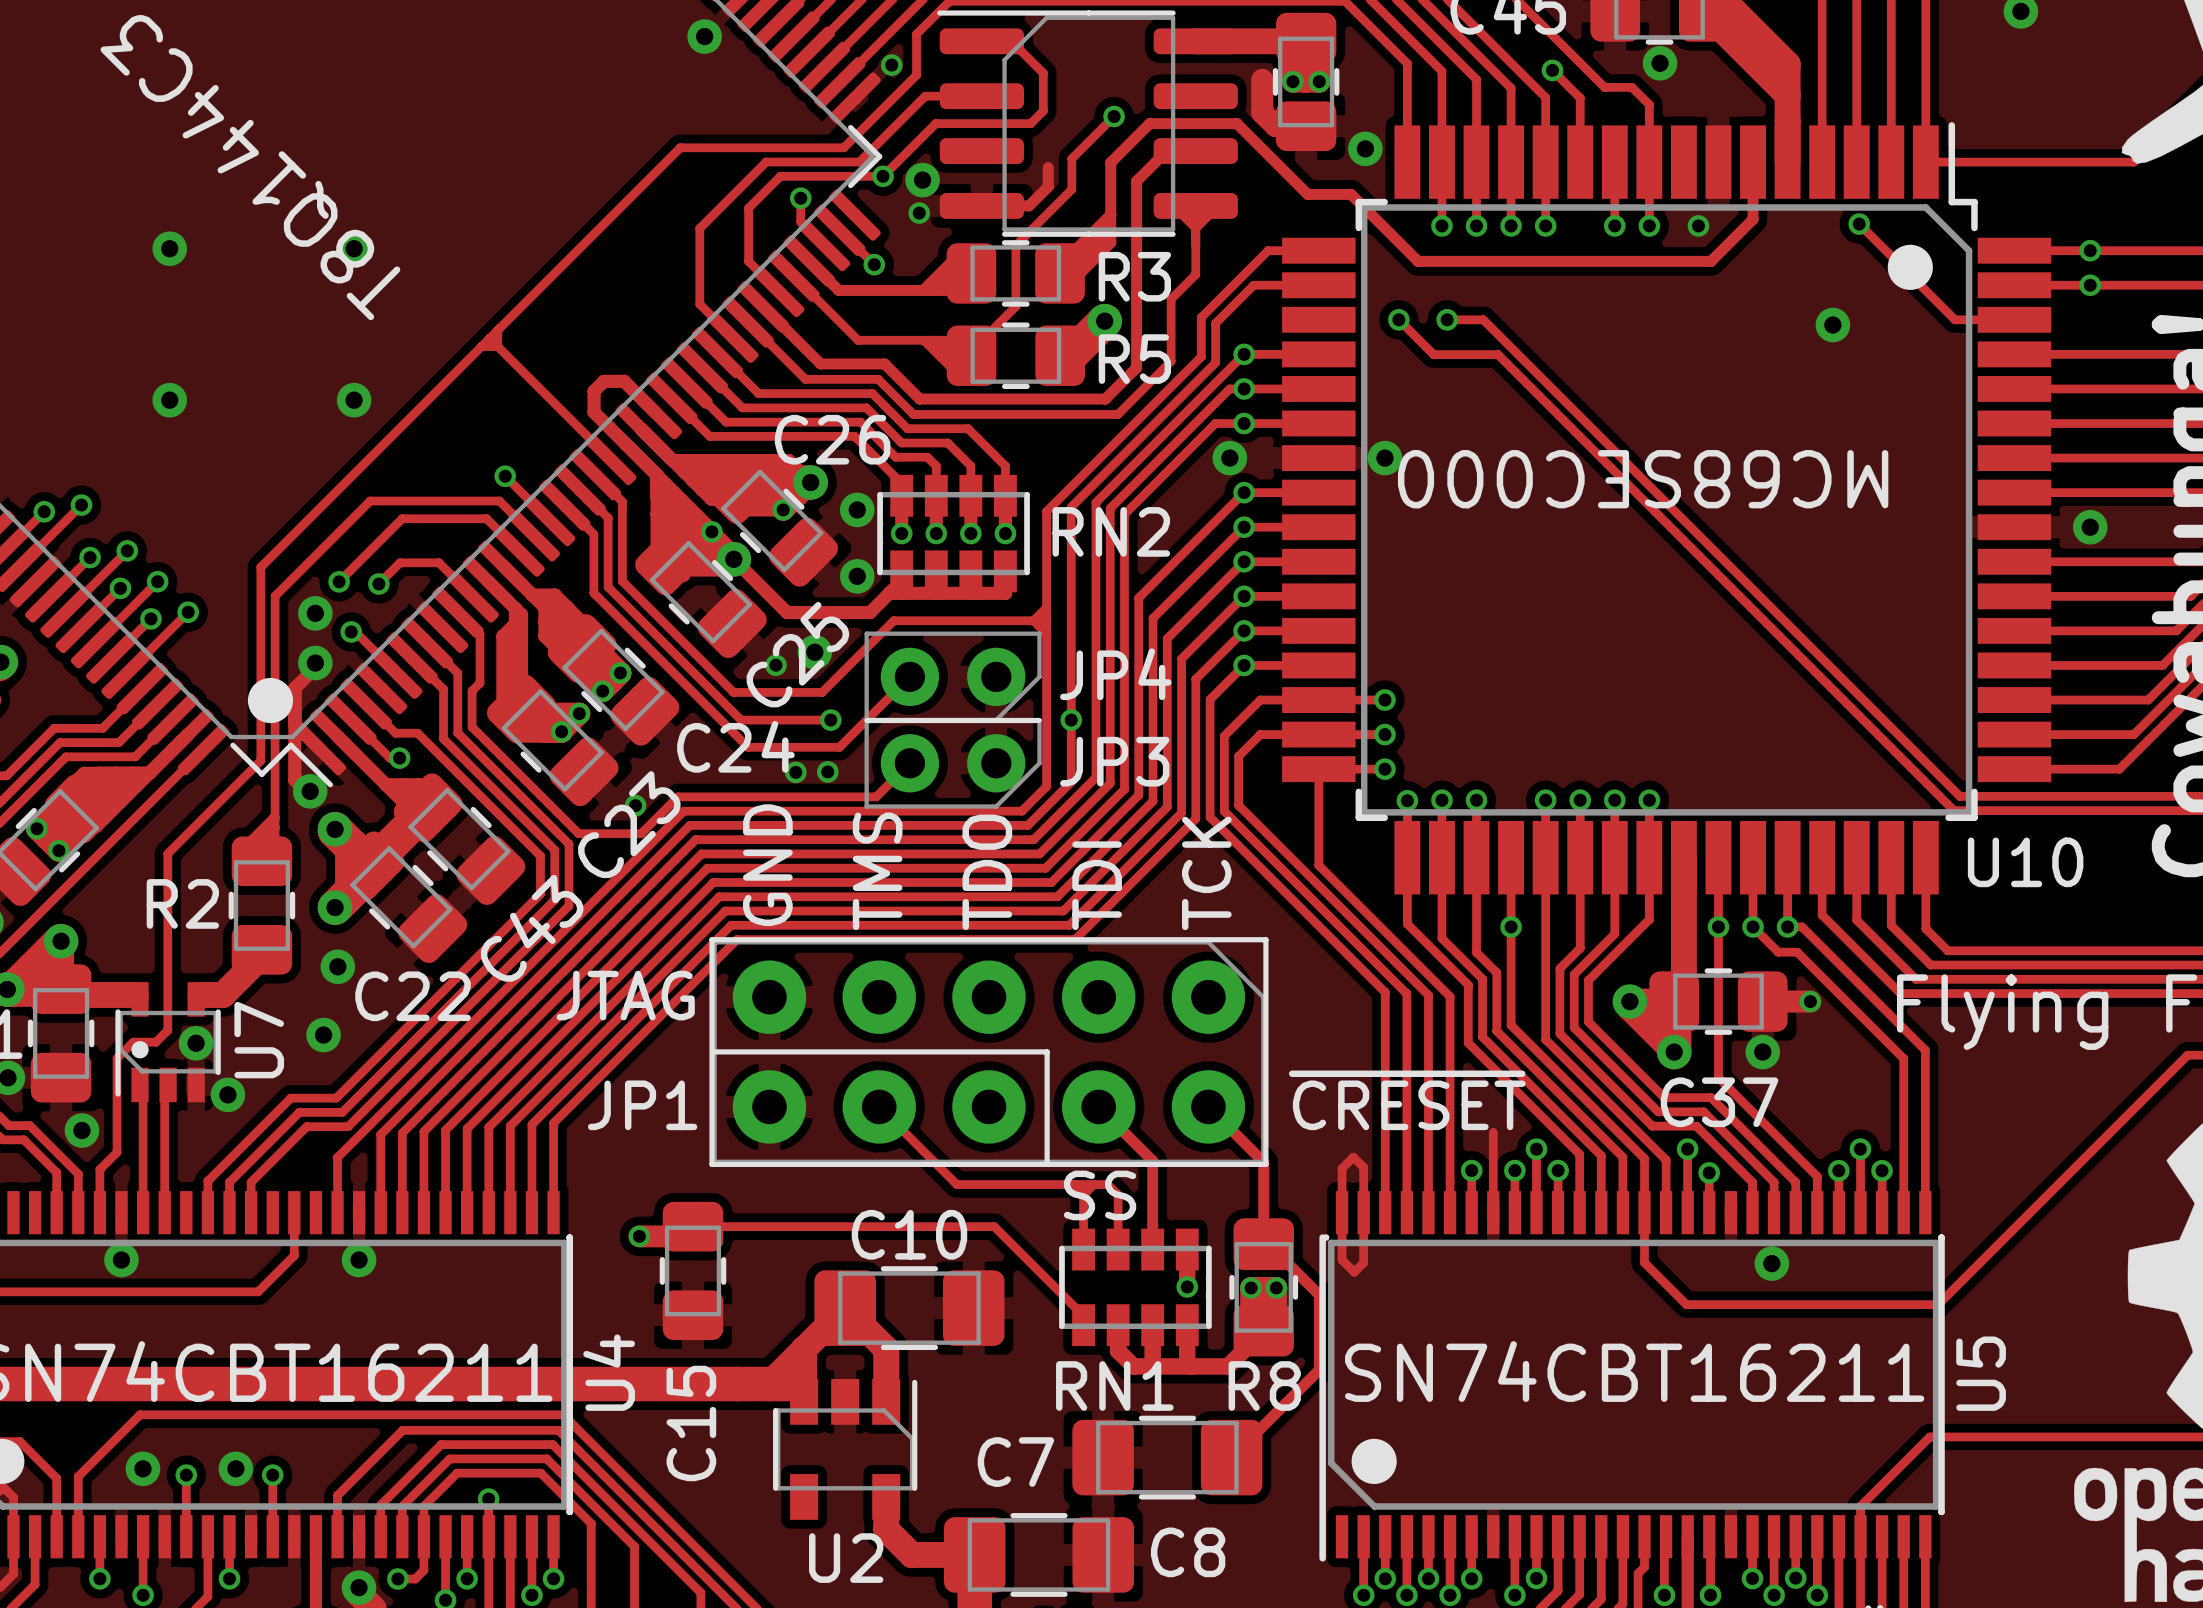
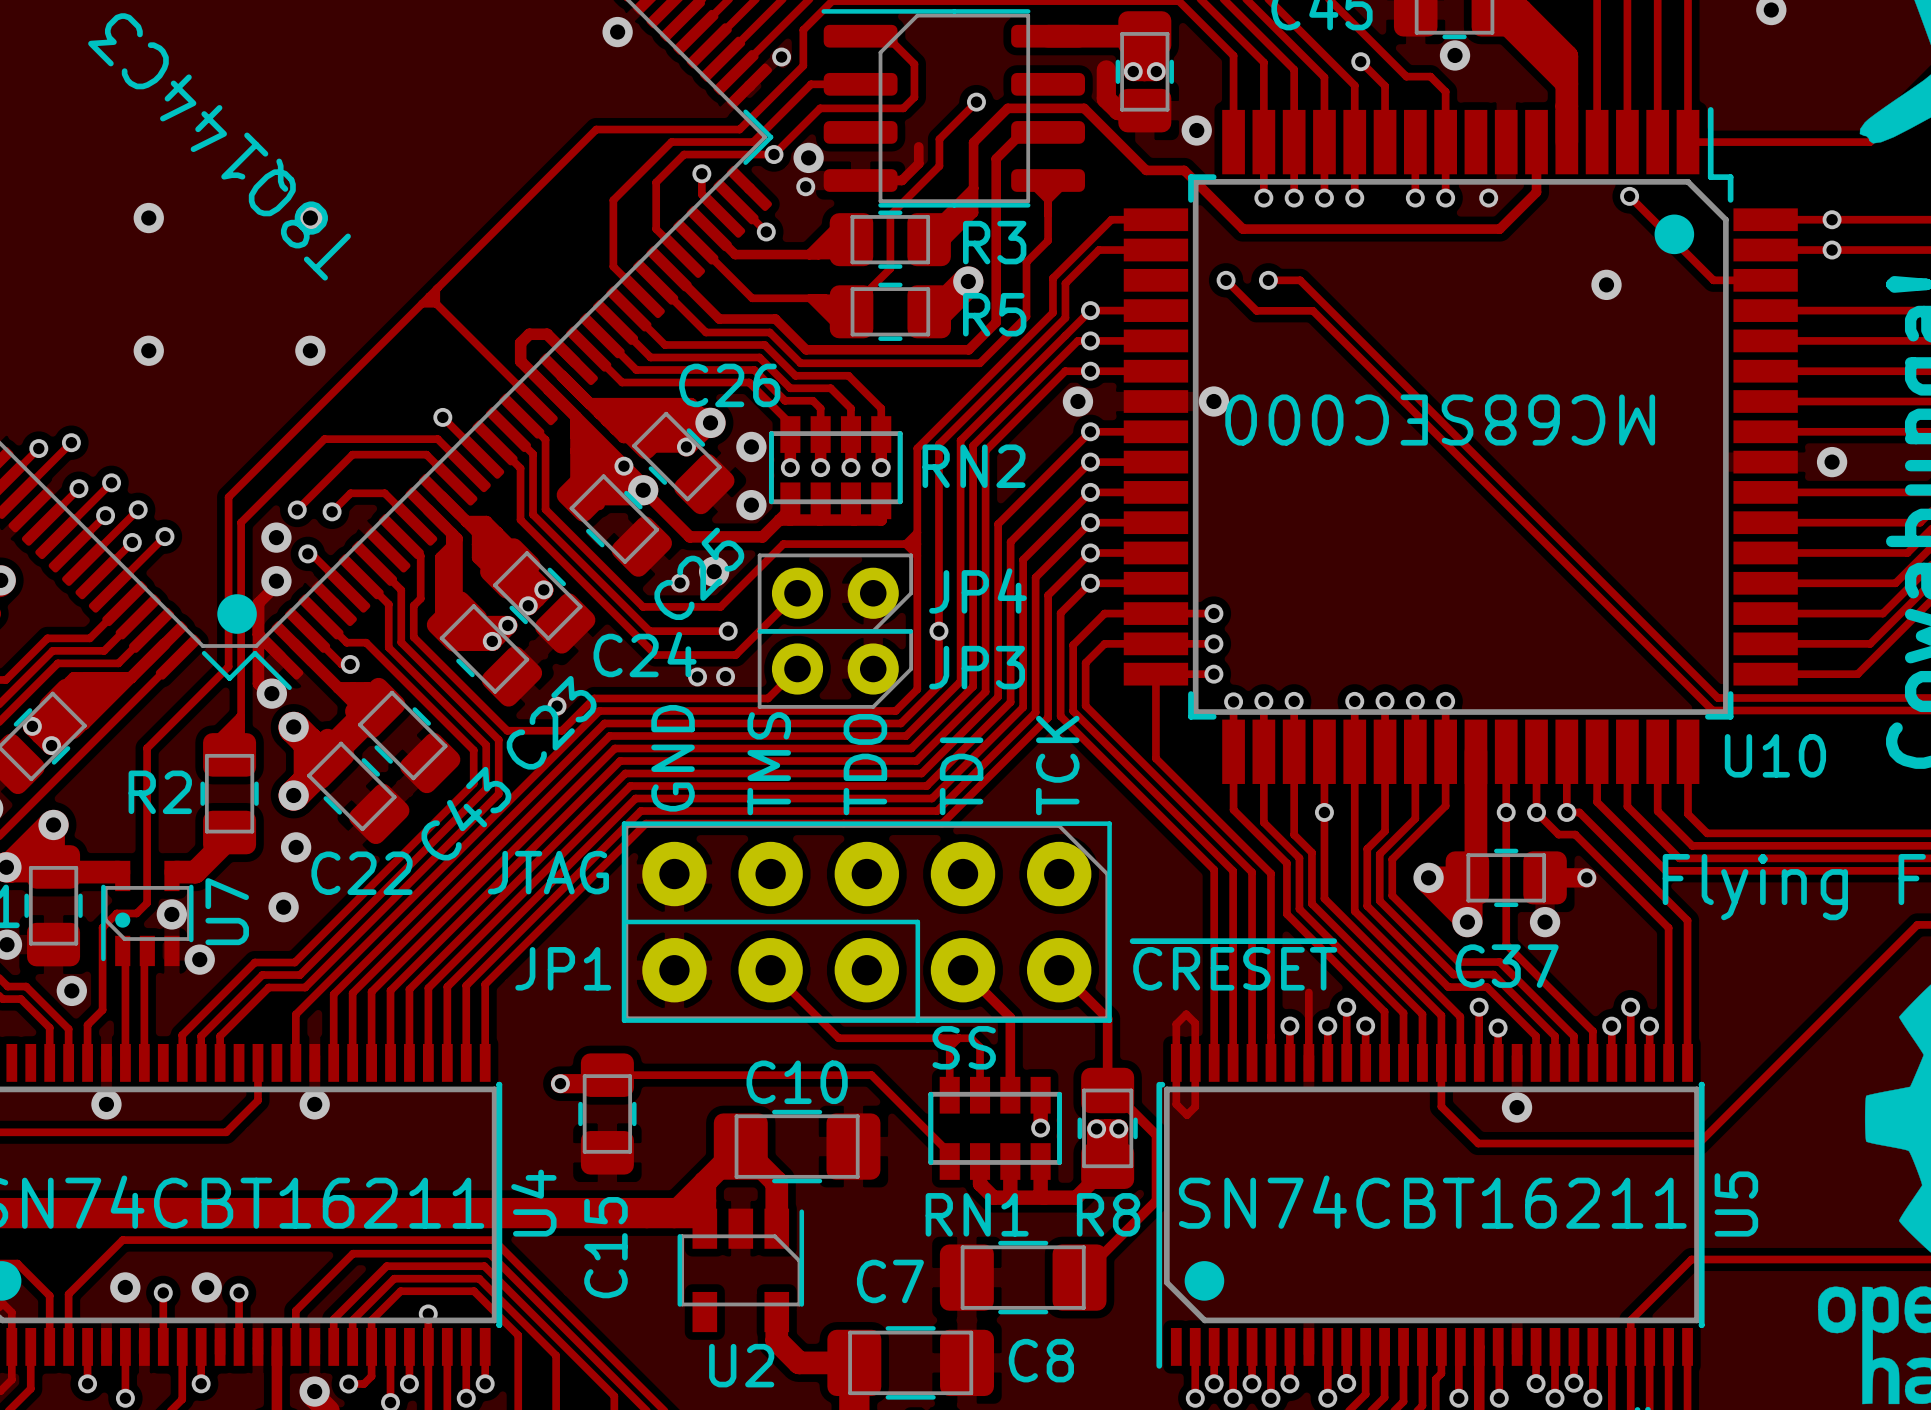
via position: (1771, 1263) -> (1517, 1107)

